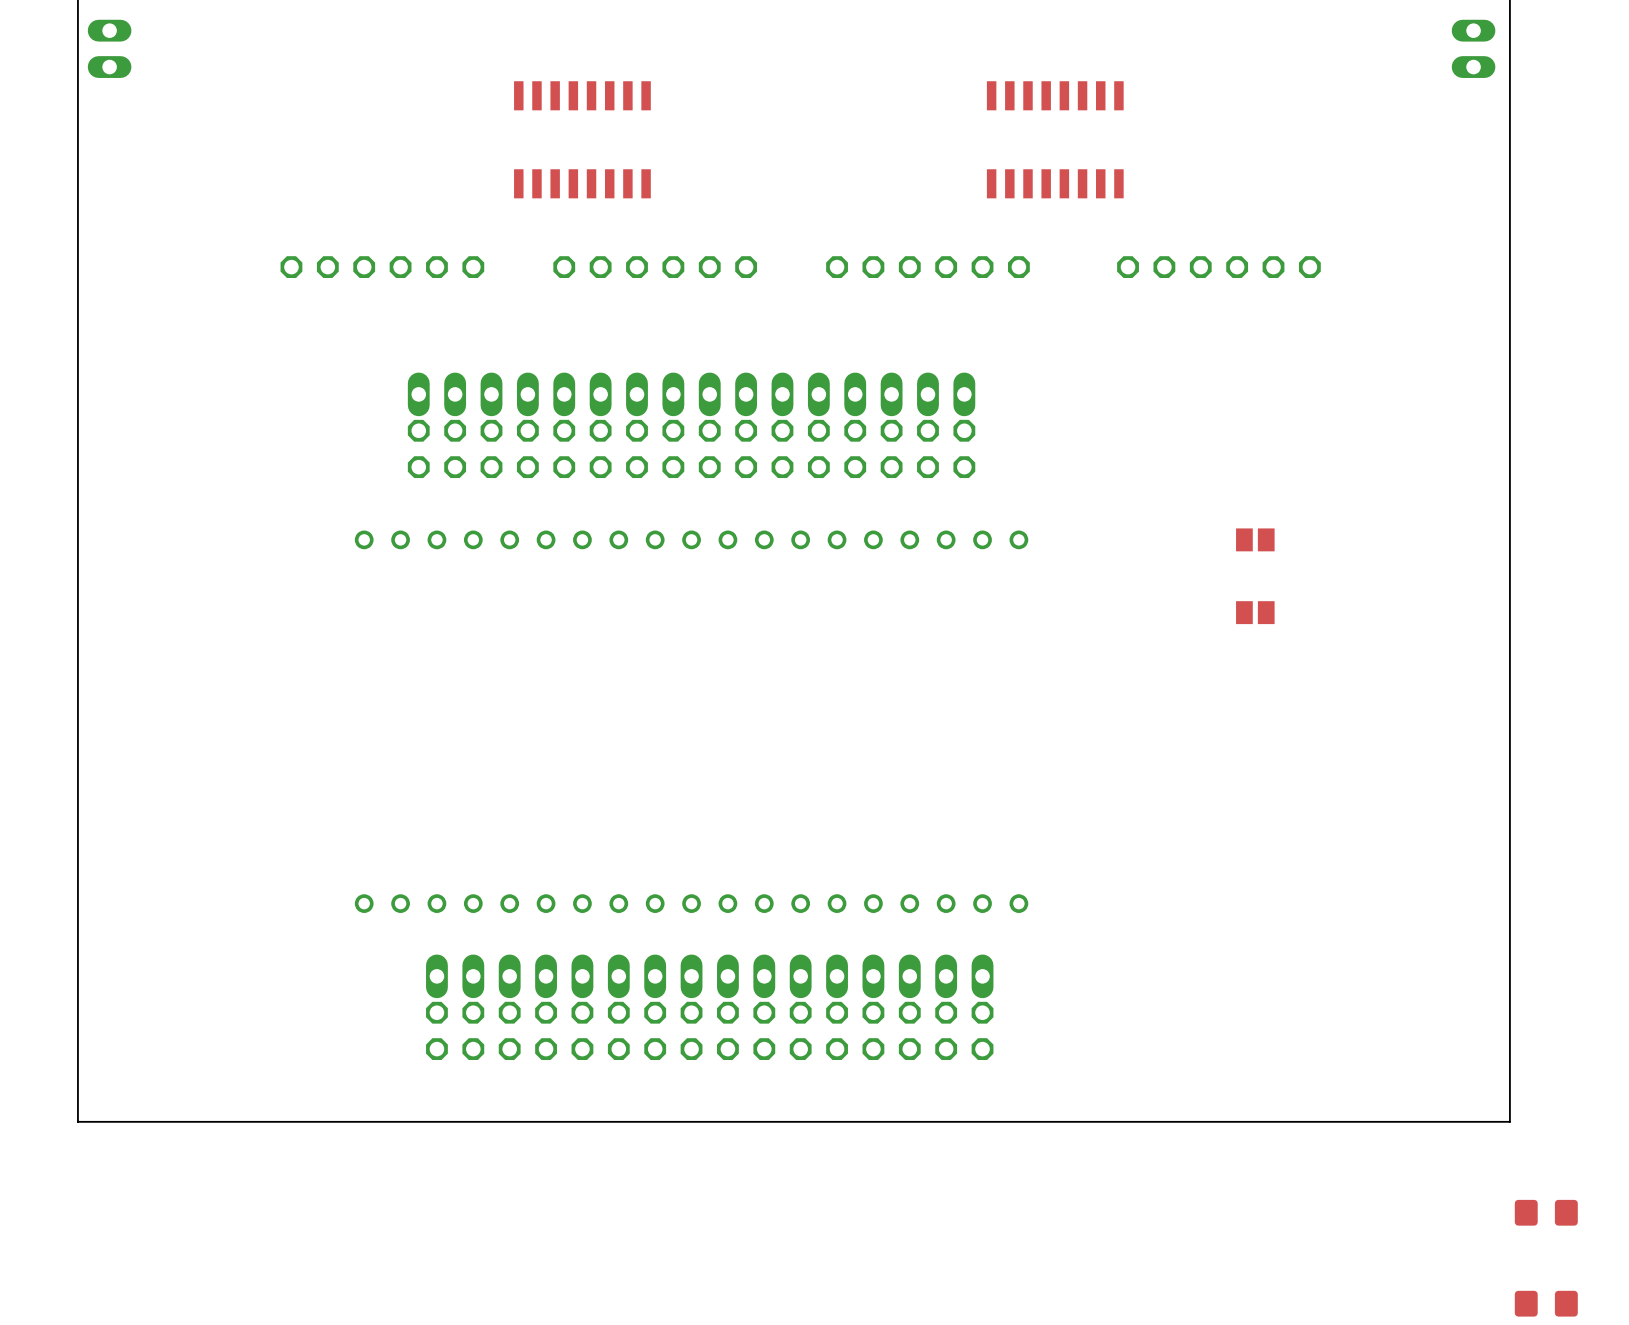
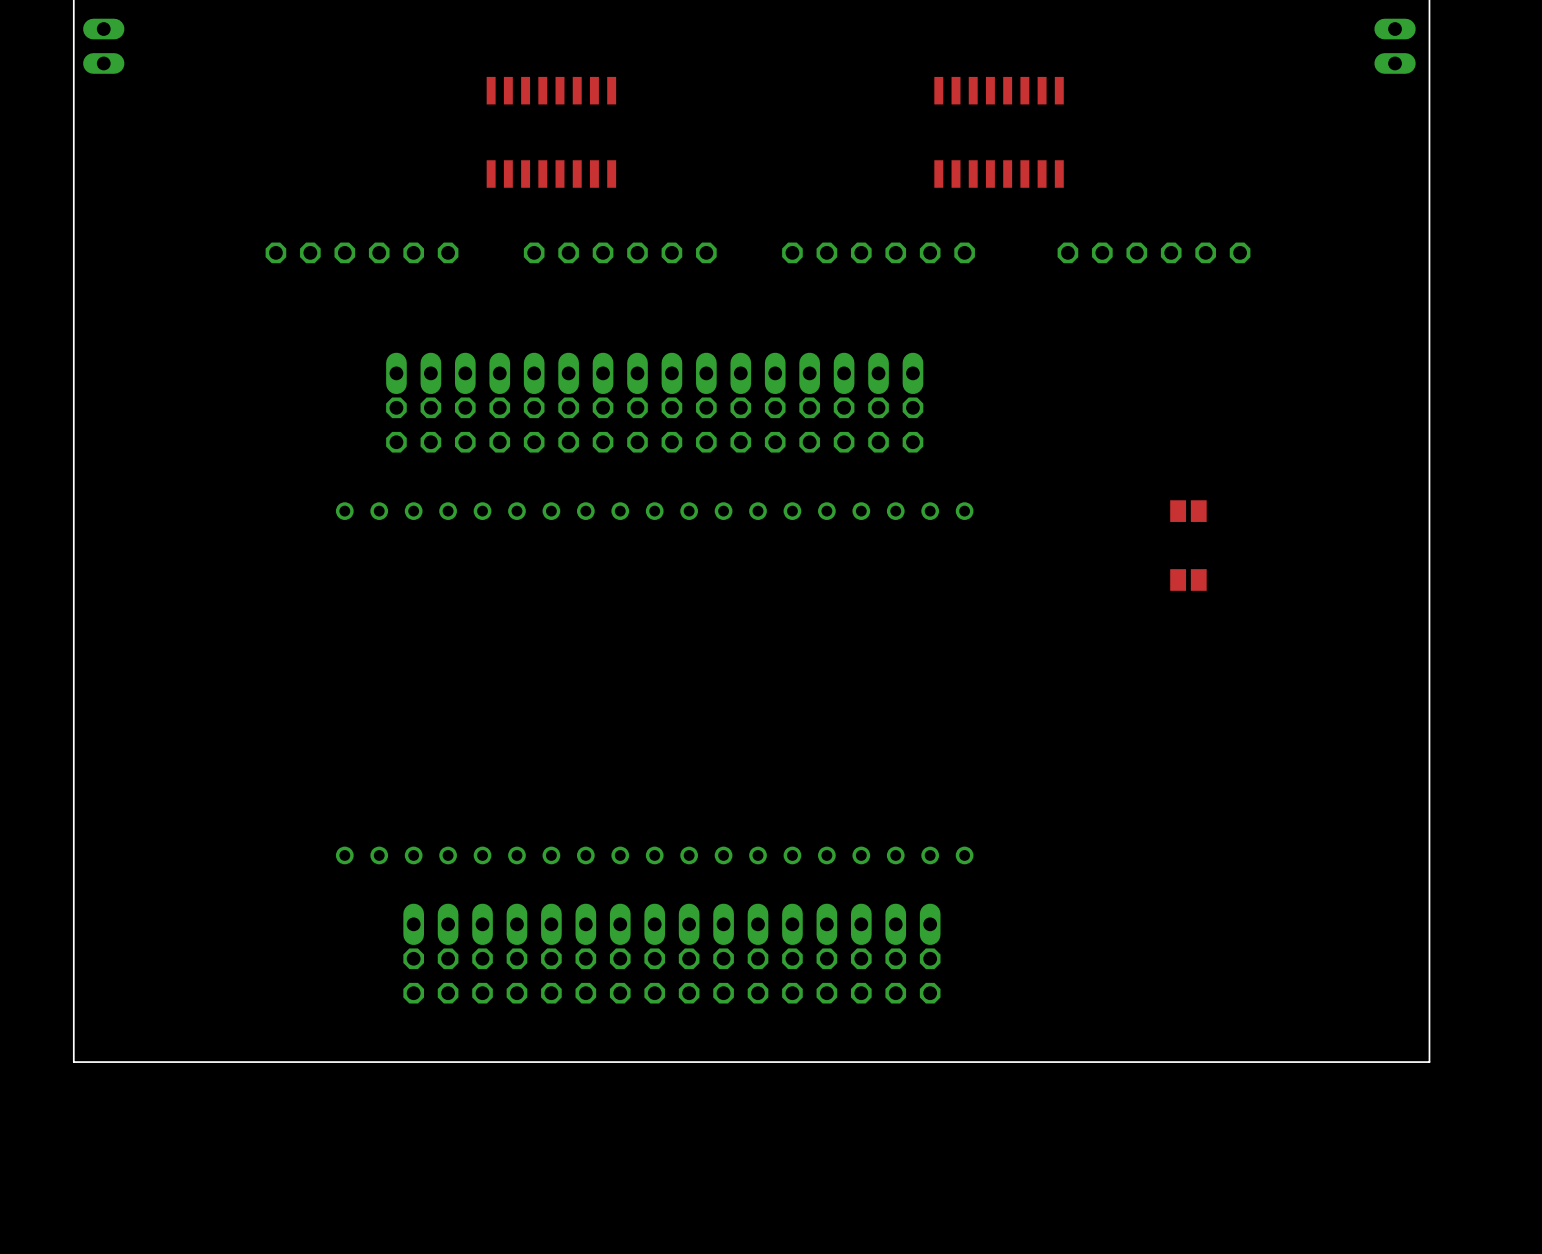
part: (1546, 1212) -> none
part: (1546, 1303) -> none

